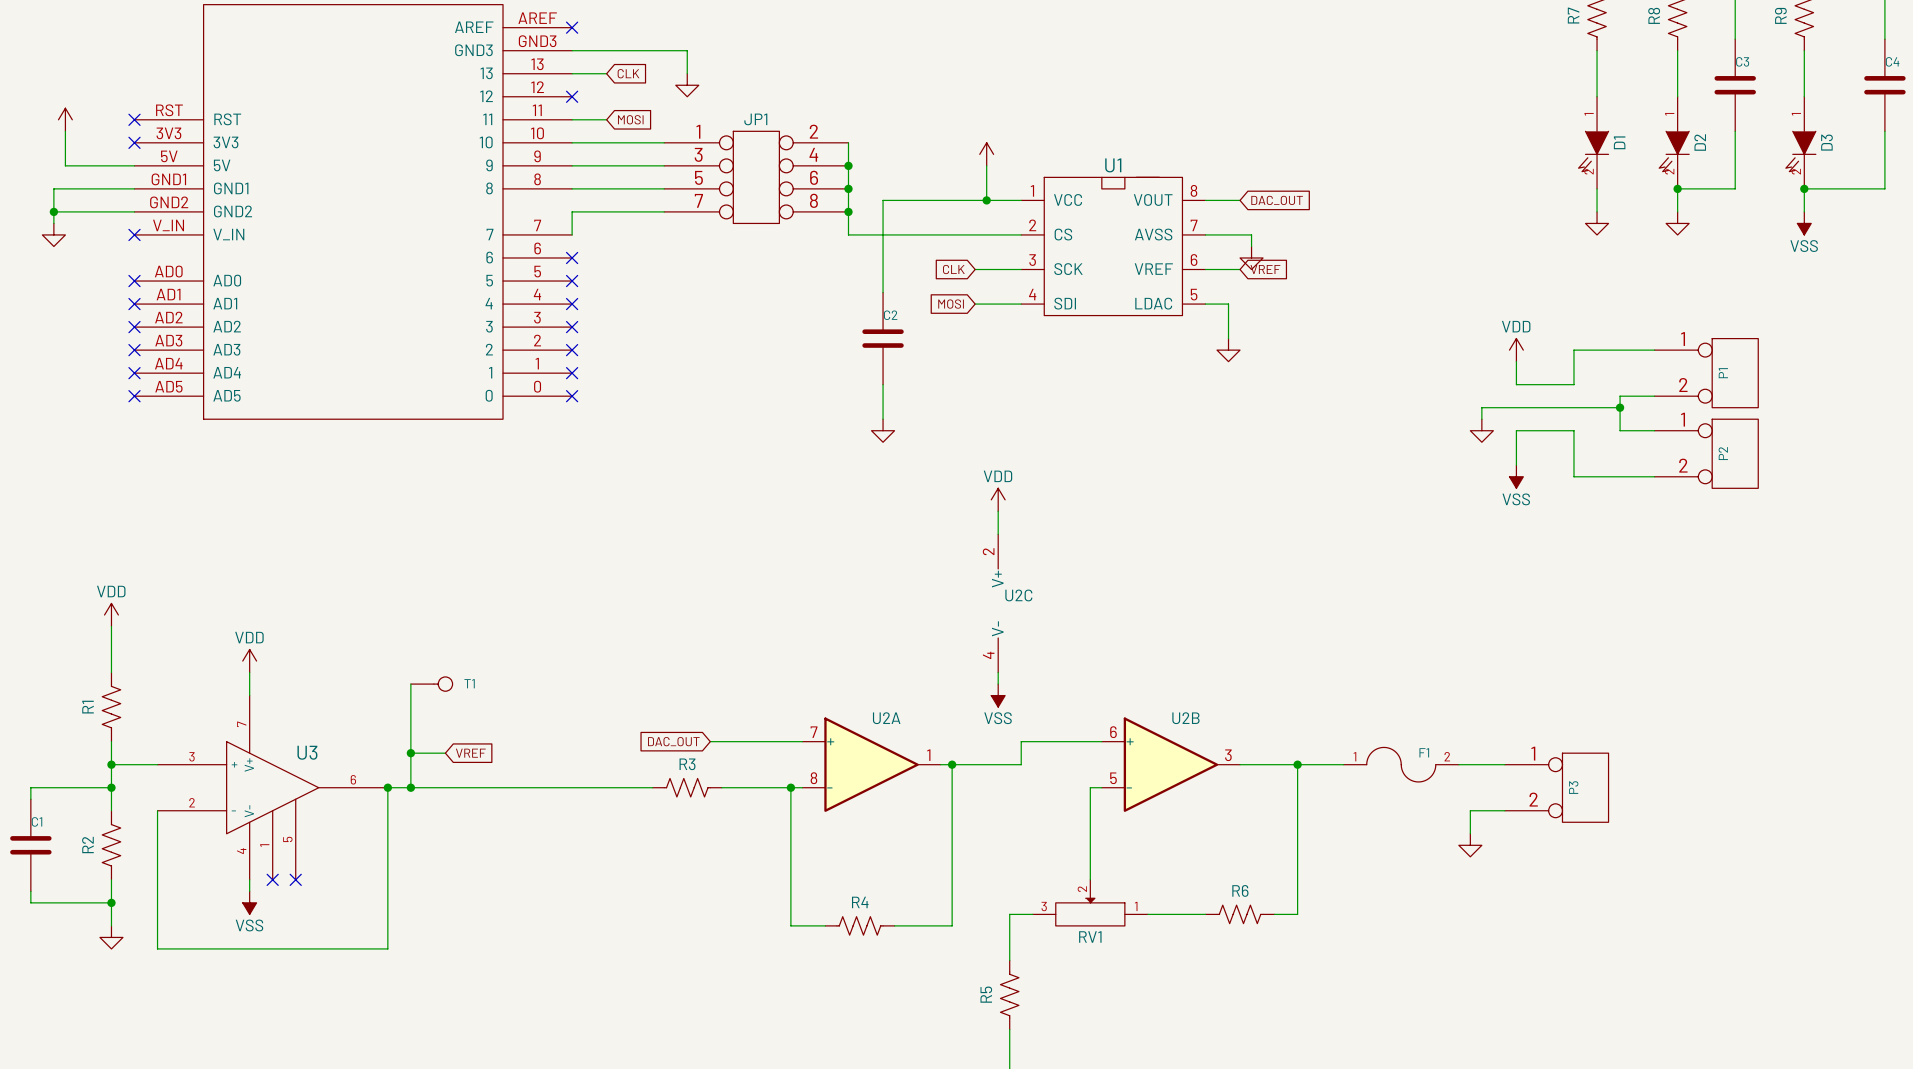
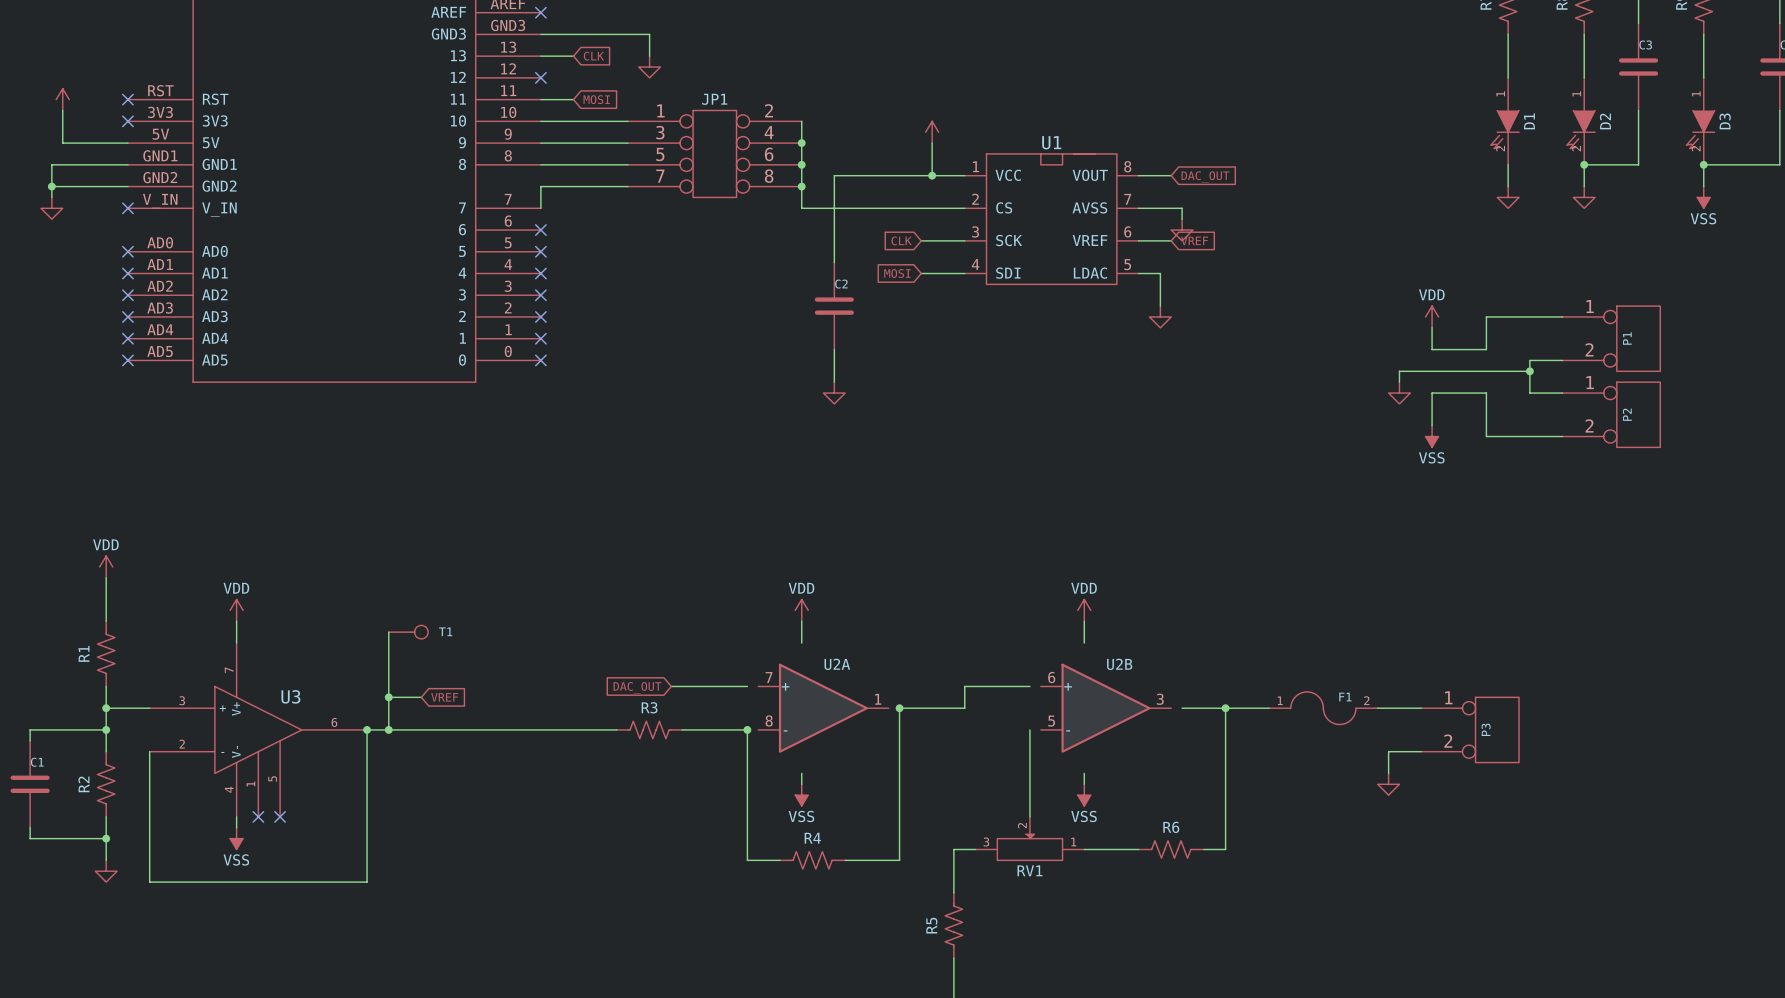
power symbol: VDD (998, 499) -> none
wire: (998, 511) (998, 534) -> (801, 621) (801, 643)
U2C: (998, 603) -> none
power symbol: none -> VDD (801, 610)
power symbol: none -> VDD (1084, 610)
wire: (998, 672) (998, 684) -> (801, 773) (801, 784)
wire: none -> (1084, 621) (1084, 643)
power symbol: VSS (998, 695) -> none
wire: (790, 741) (802, 741) -> none
wire: (1090, 741) (1101, 741) -> none
wire: (940, 764) (952, 764) -> none
wire: (1240, 764) (1251, 764) -> none
wire: (790, 787) (802, 787) -> none
wire: (1090, 787) (1101, 787) -> none
wire: none -> (1084, 773) (1084, 784)
power symbol: none -> VSS (801, 795)
power symbol: none -> VSS (1084, 795)

